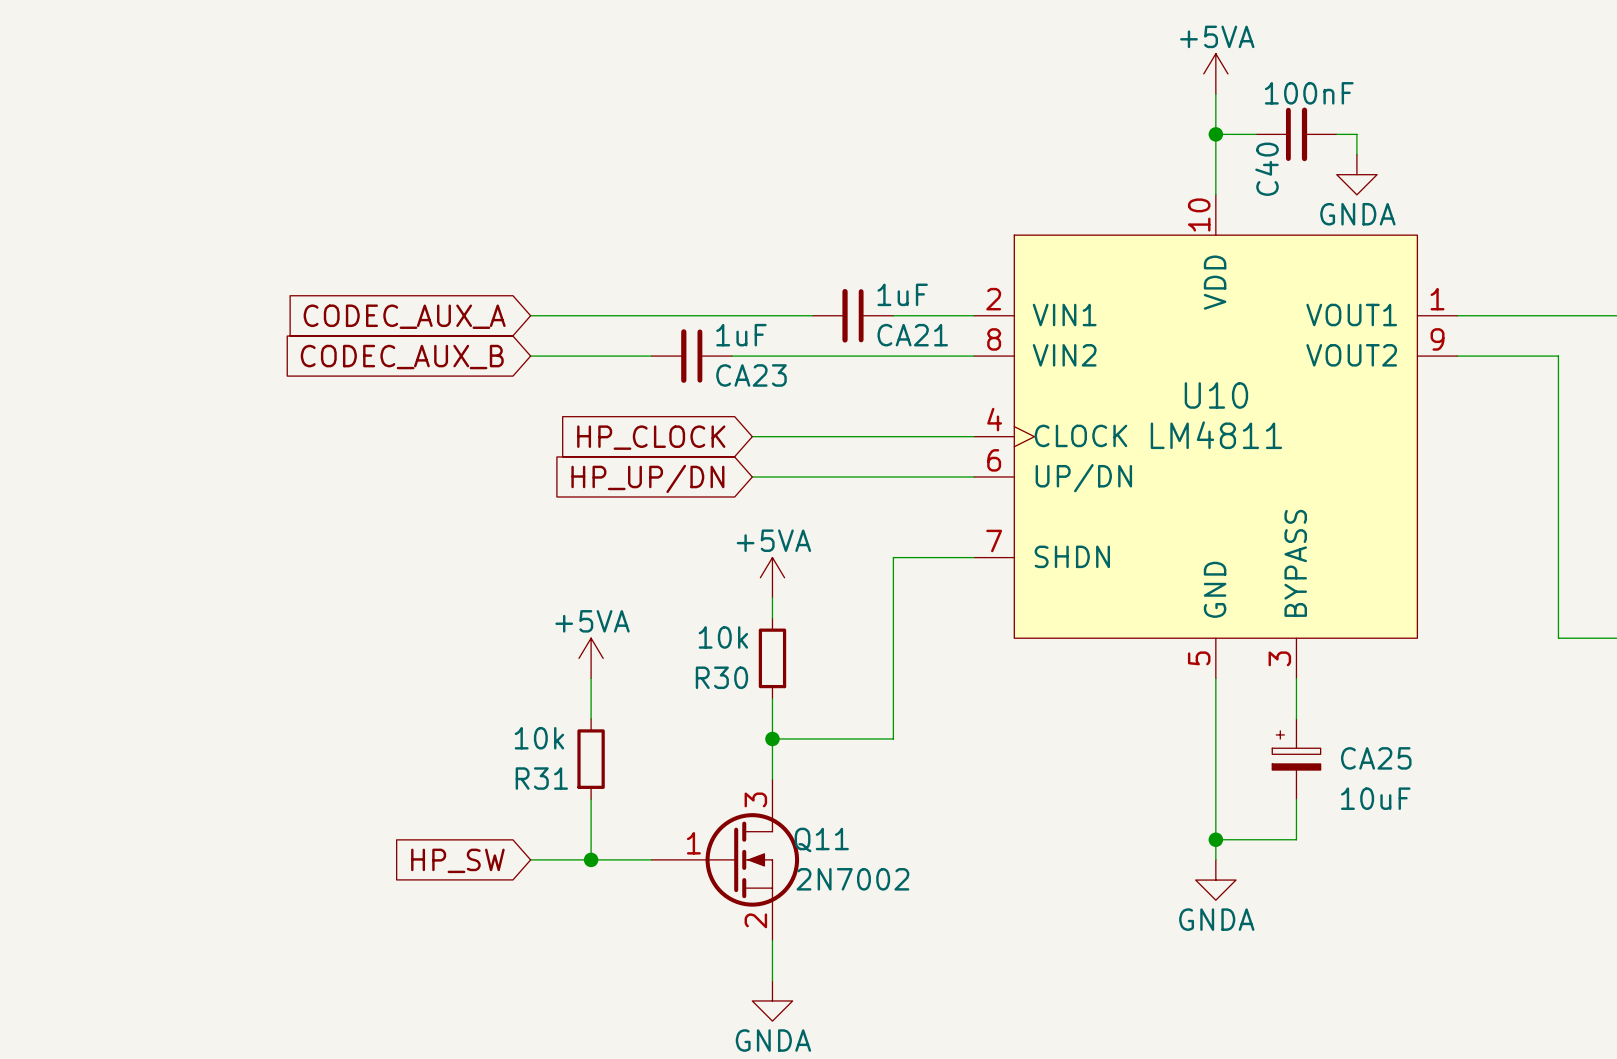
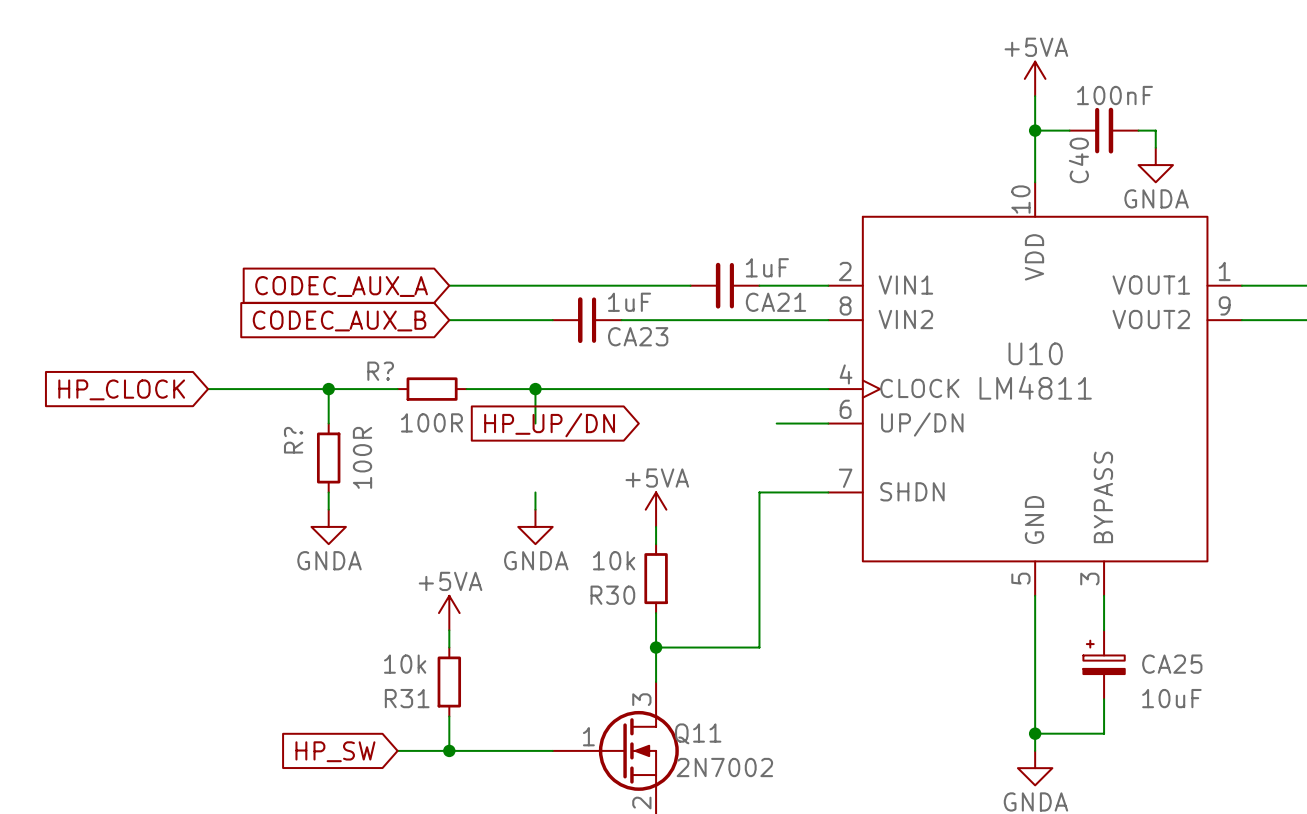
wire: none -> (208, 389) (397, 389)
wire: none -> (328, 389) (328, 423)
junction: none -> (328, 389)
R?: none -> 100R (432, 389)
wire: none -> (466, 389) (638, 389)
junction: none -> (535, 389)
global label: none -> HP_CLOCK (121, 389)
global label: HP_CLOCK (651, 437) -> none
wire: (752, 476) (913, 476) -> none
R?: none -> 100R (328, 458)
wire: none -> (328, 492) (328, 509)
wire: none -> (535, 492) (535, 509)
power symbol: none -> GNDA (328, 526)
power symbol: none -> GNDA (535, 526)
power symbol position: +5VA (591, 658) -> +5VA (449, 613)
wire: (591, 678) (591, 718) -> (535, 389) (535, 423)
wire: none -> (449, 630) (449, 647)
R31 position: (591, 759) -> (449, 681)
wire: (591, 799) (591, 859) -> none
wire: none -> (449, 716) (449, 750) (397, 750)
junction position: (591, 859) -> (449, 750)
global label position: HP_SW (457, 860) -> HP_SW (335, 751)

